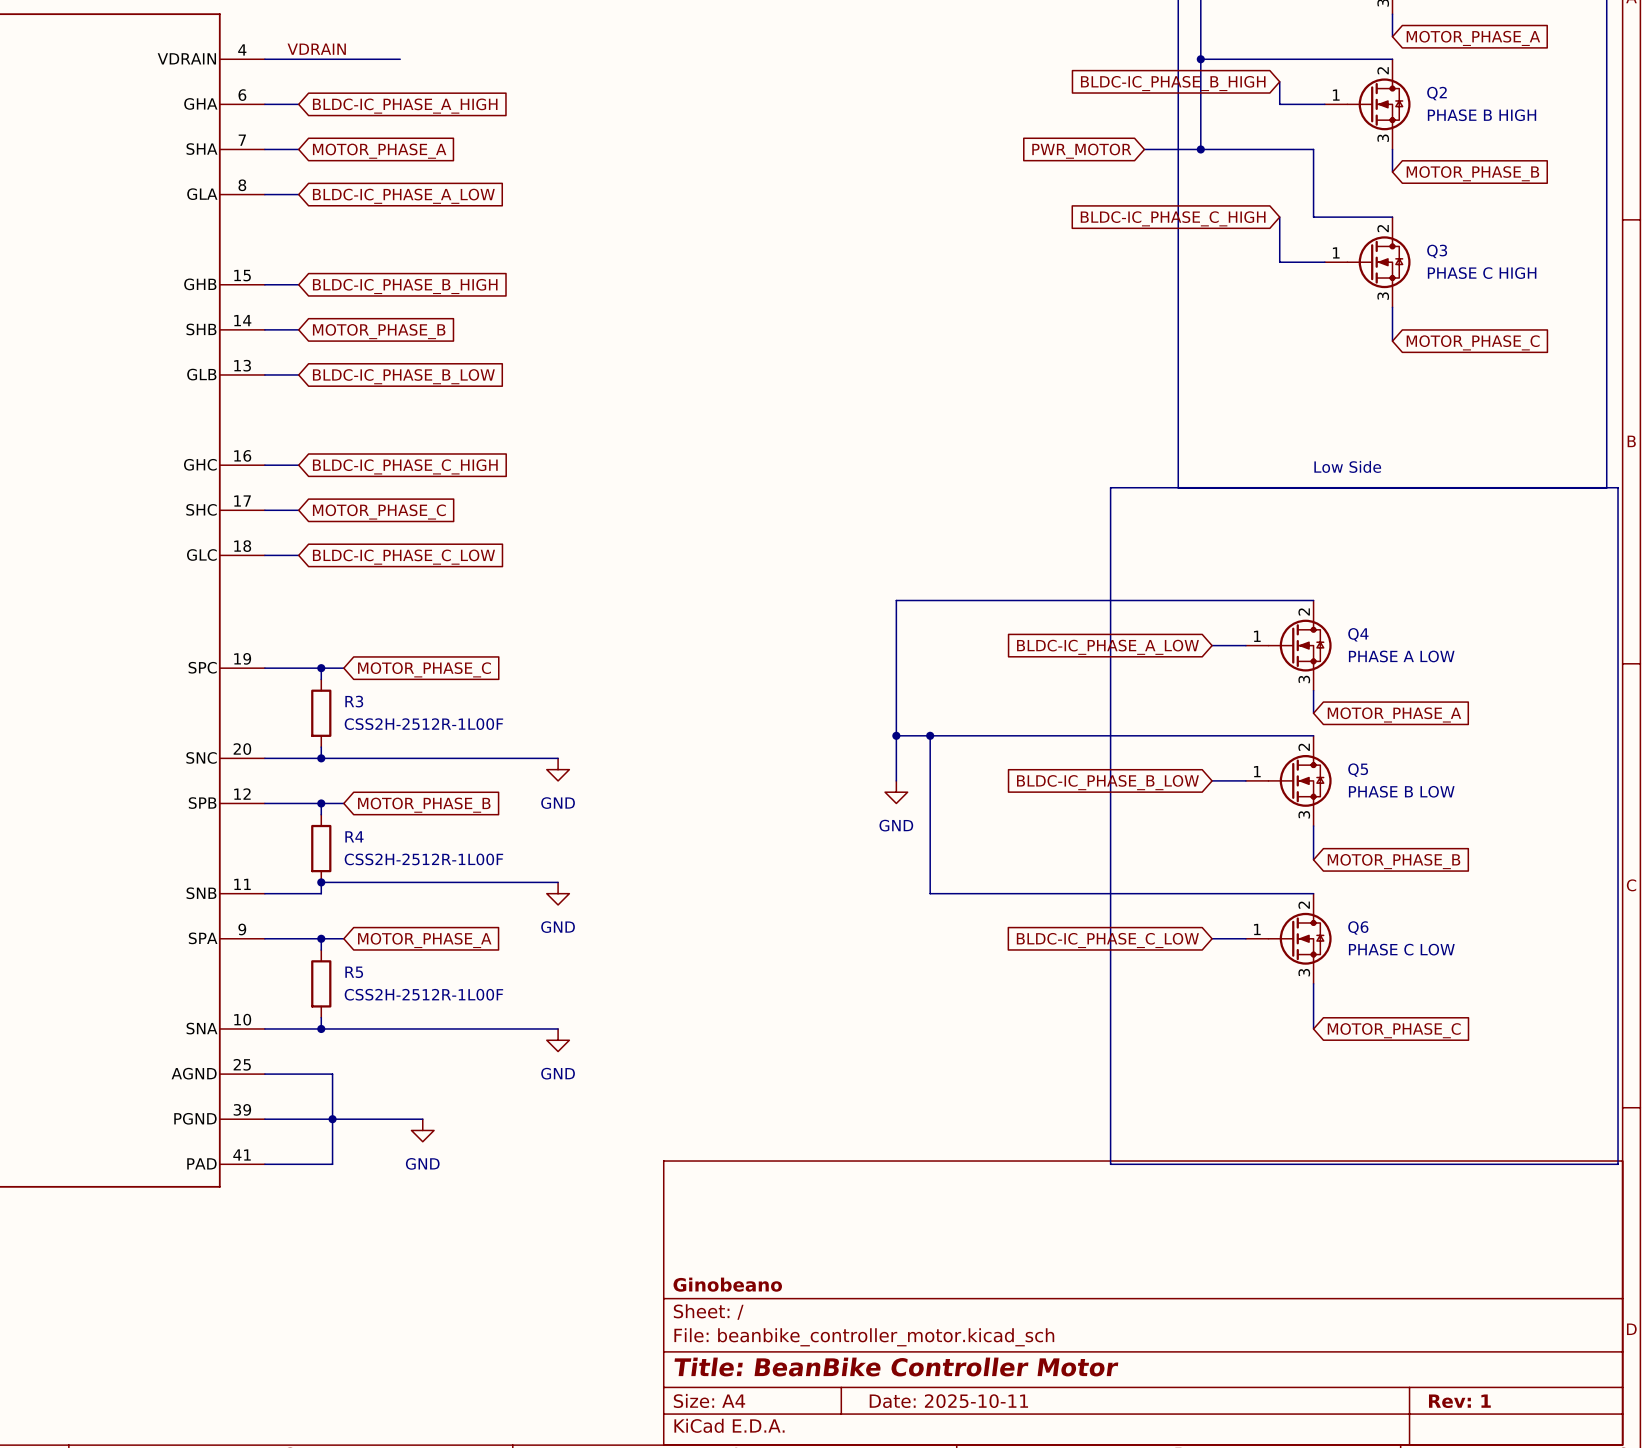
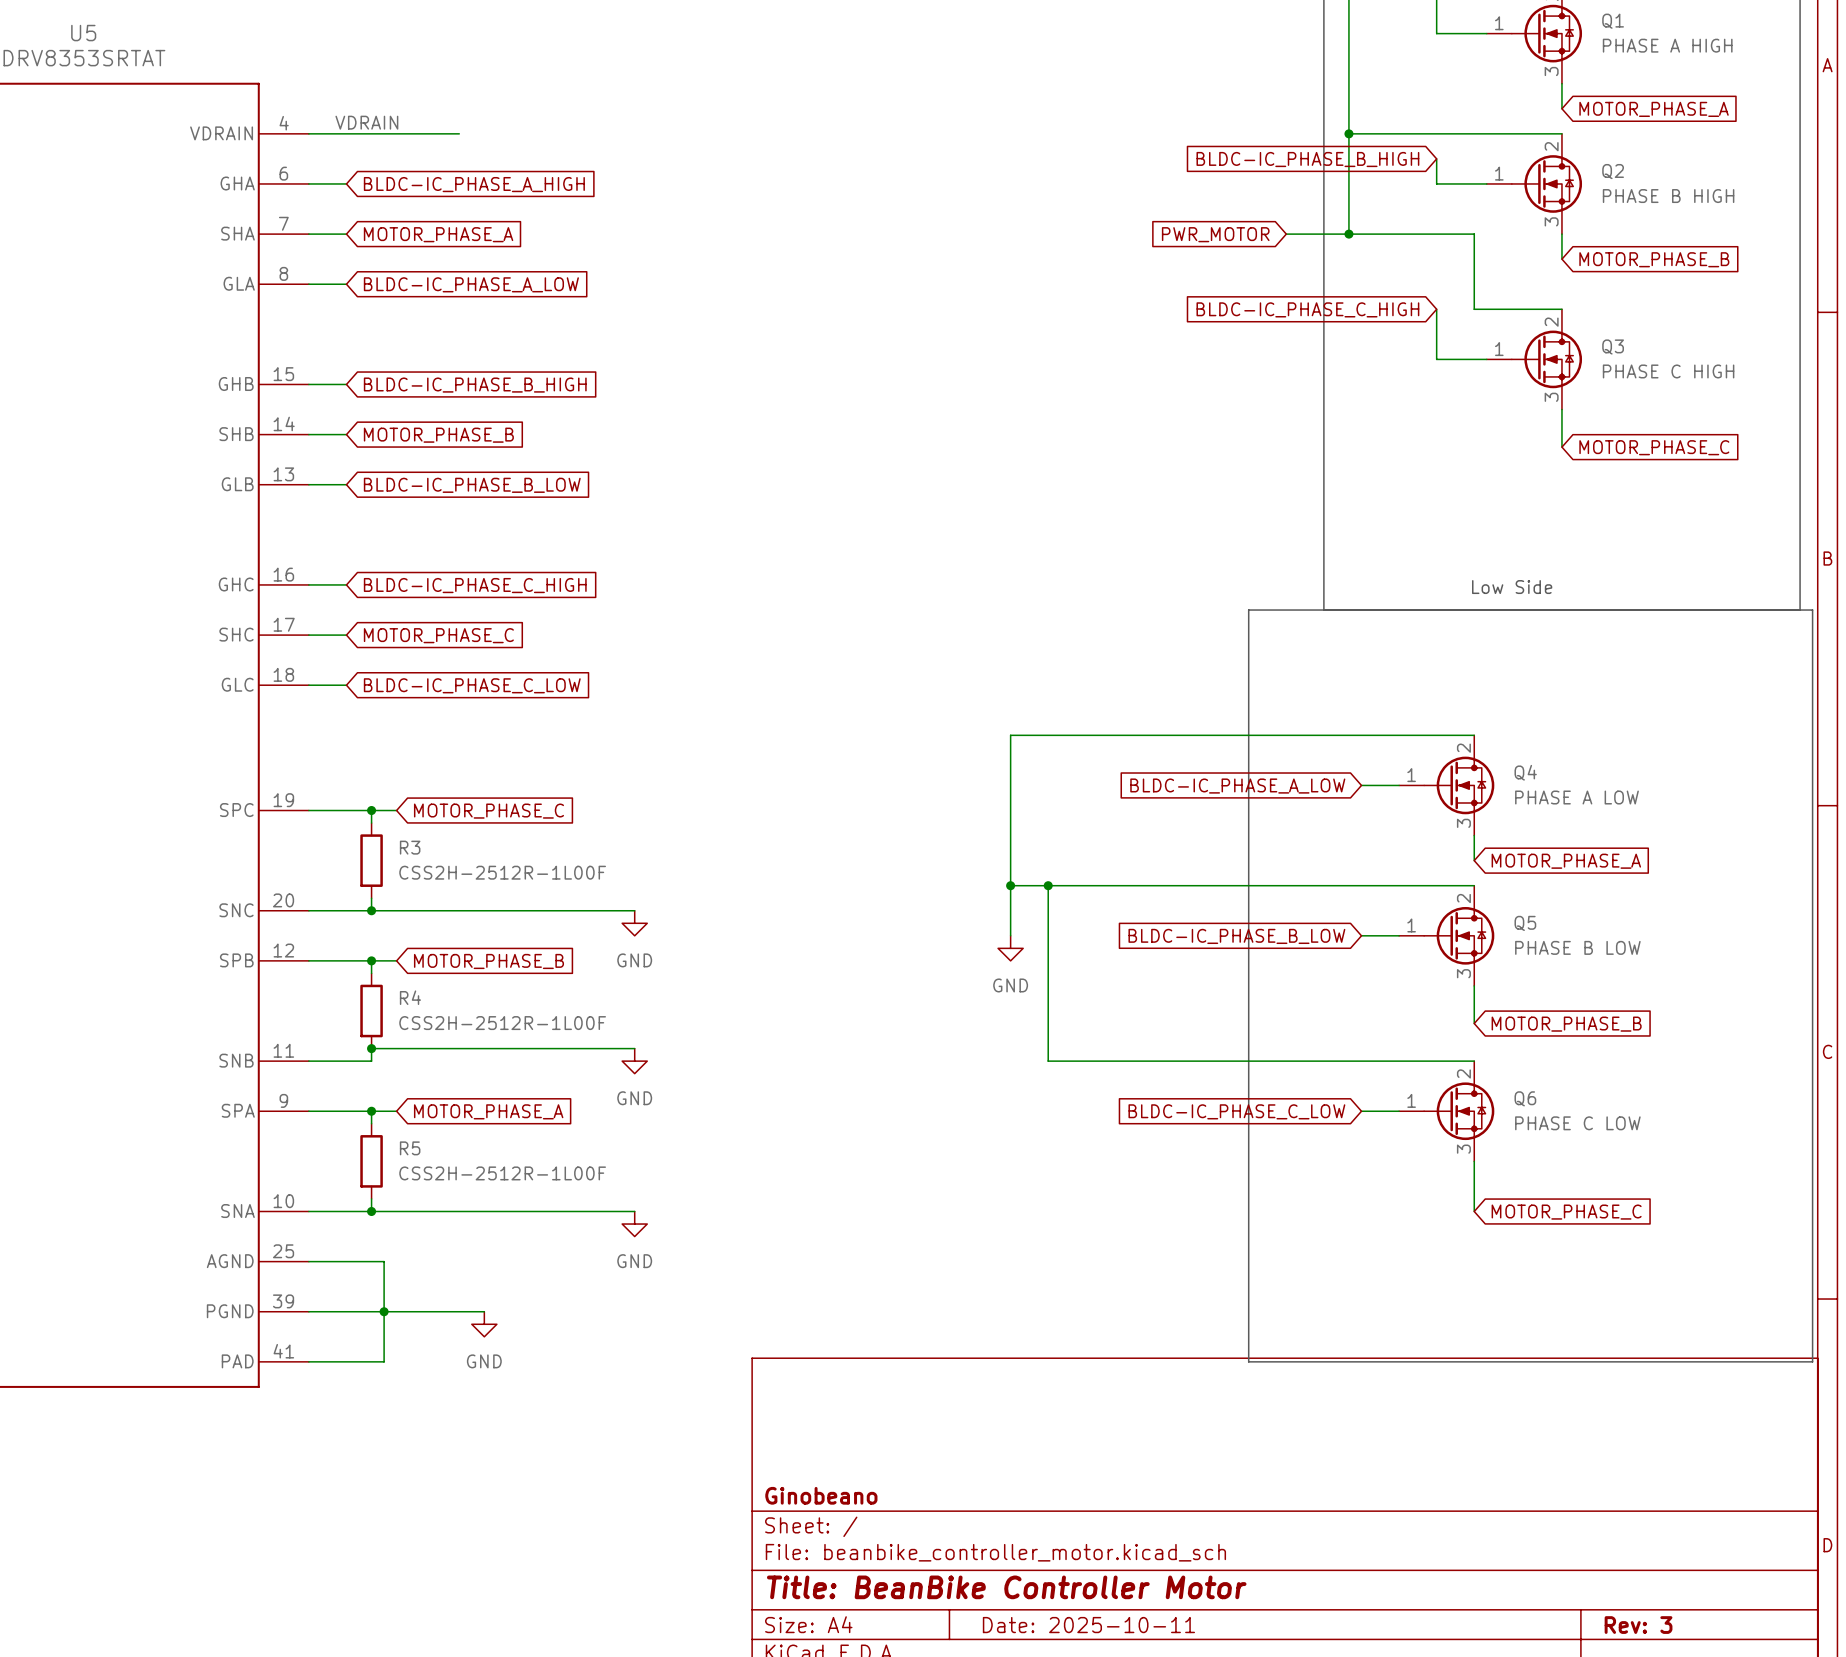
title block: Rev: 1 (1459, 1401) -> Rev: 3 (1638, 1625)

